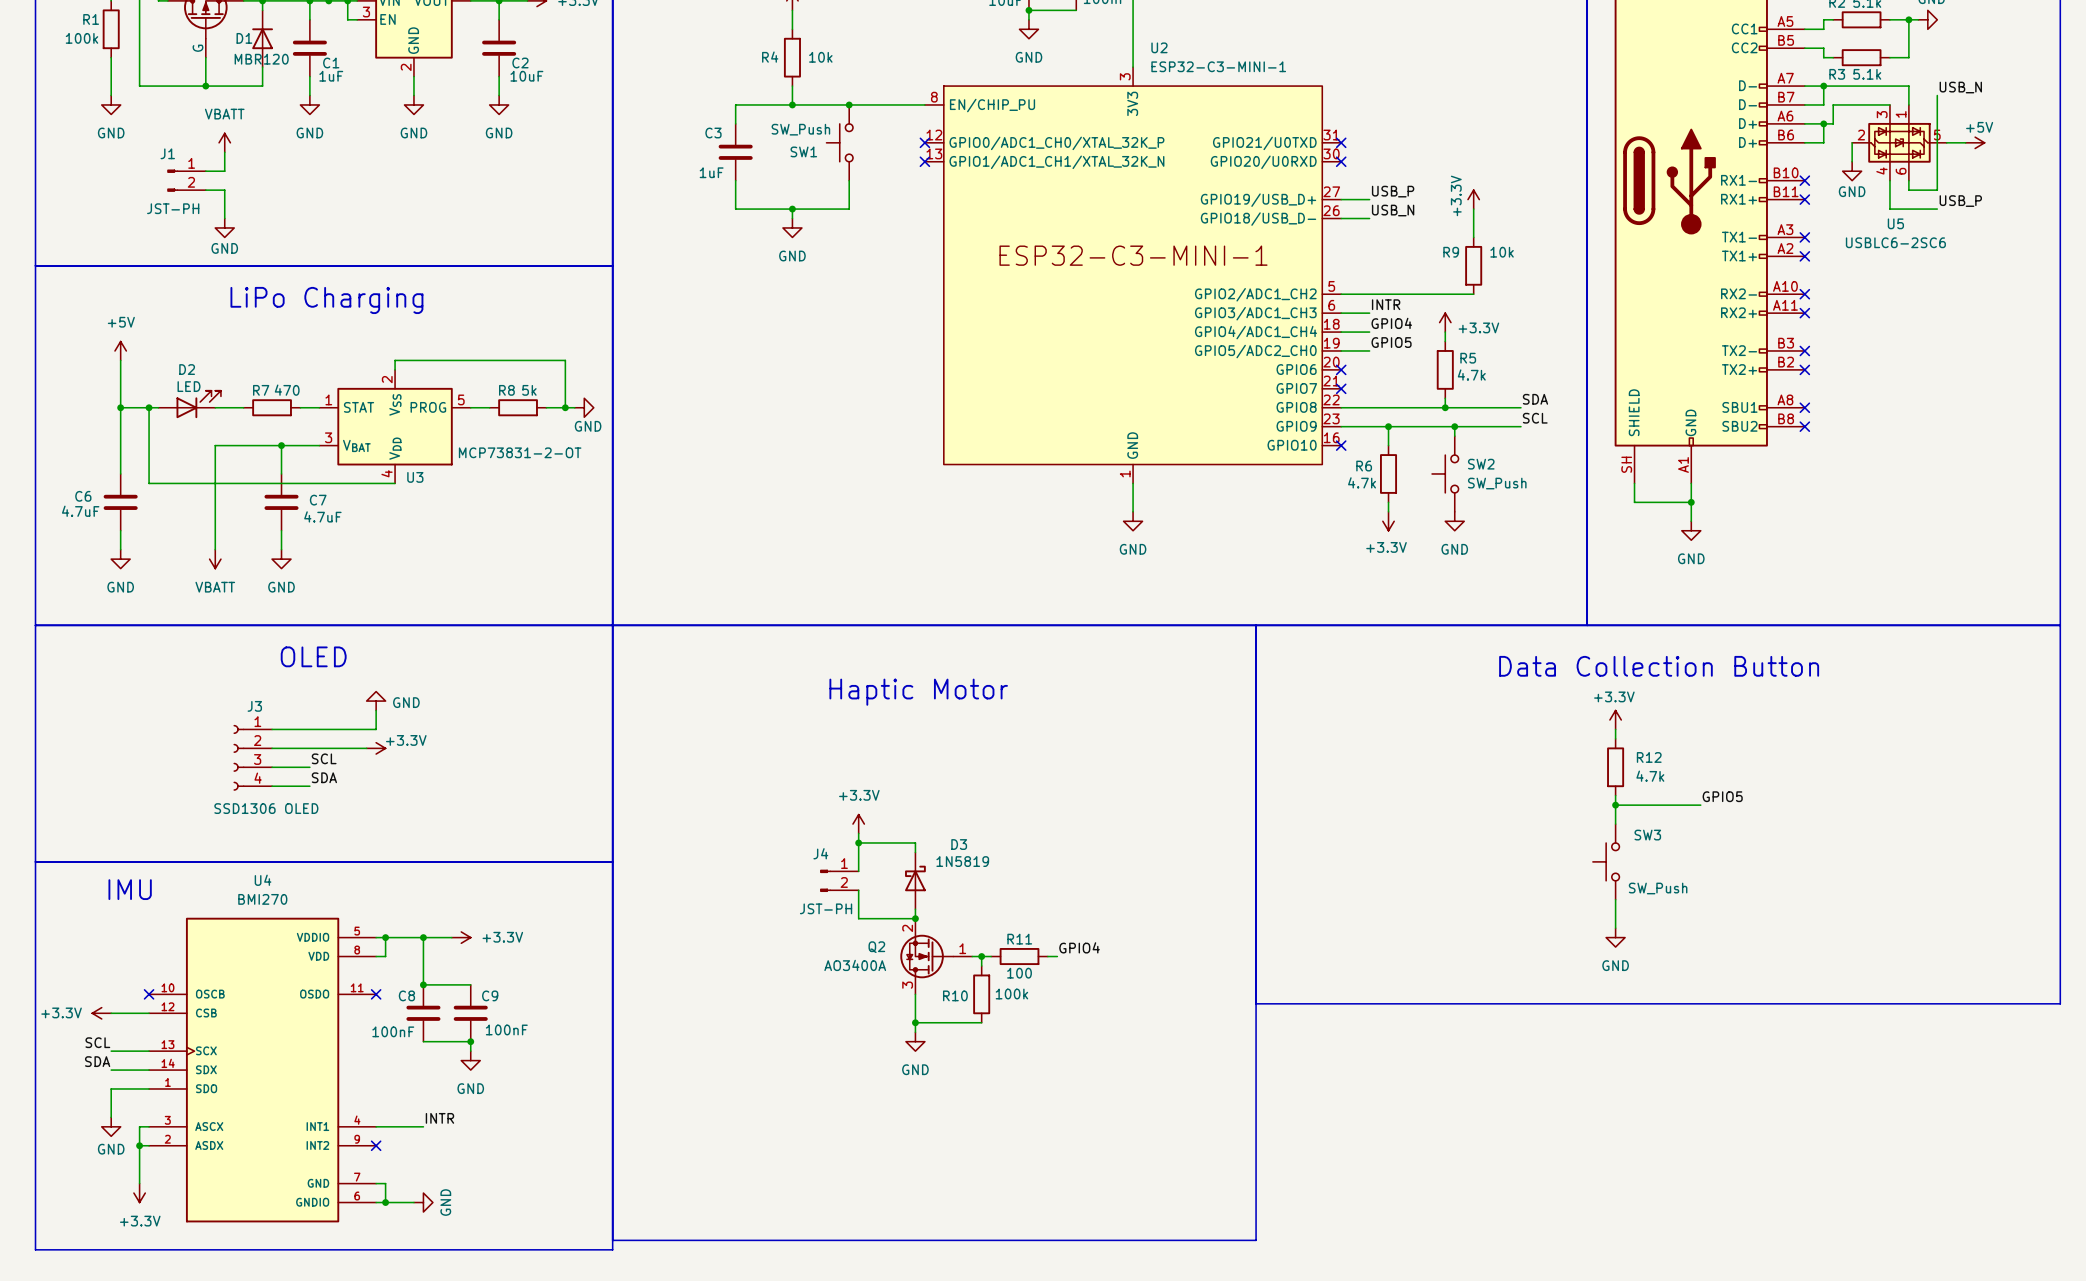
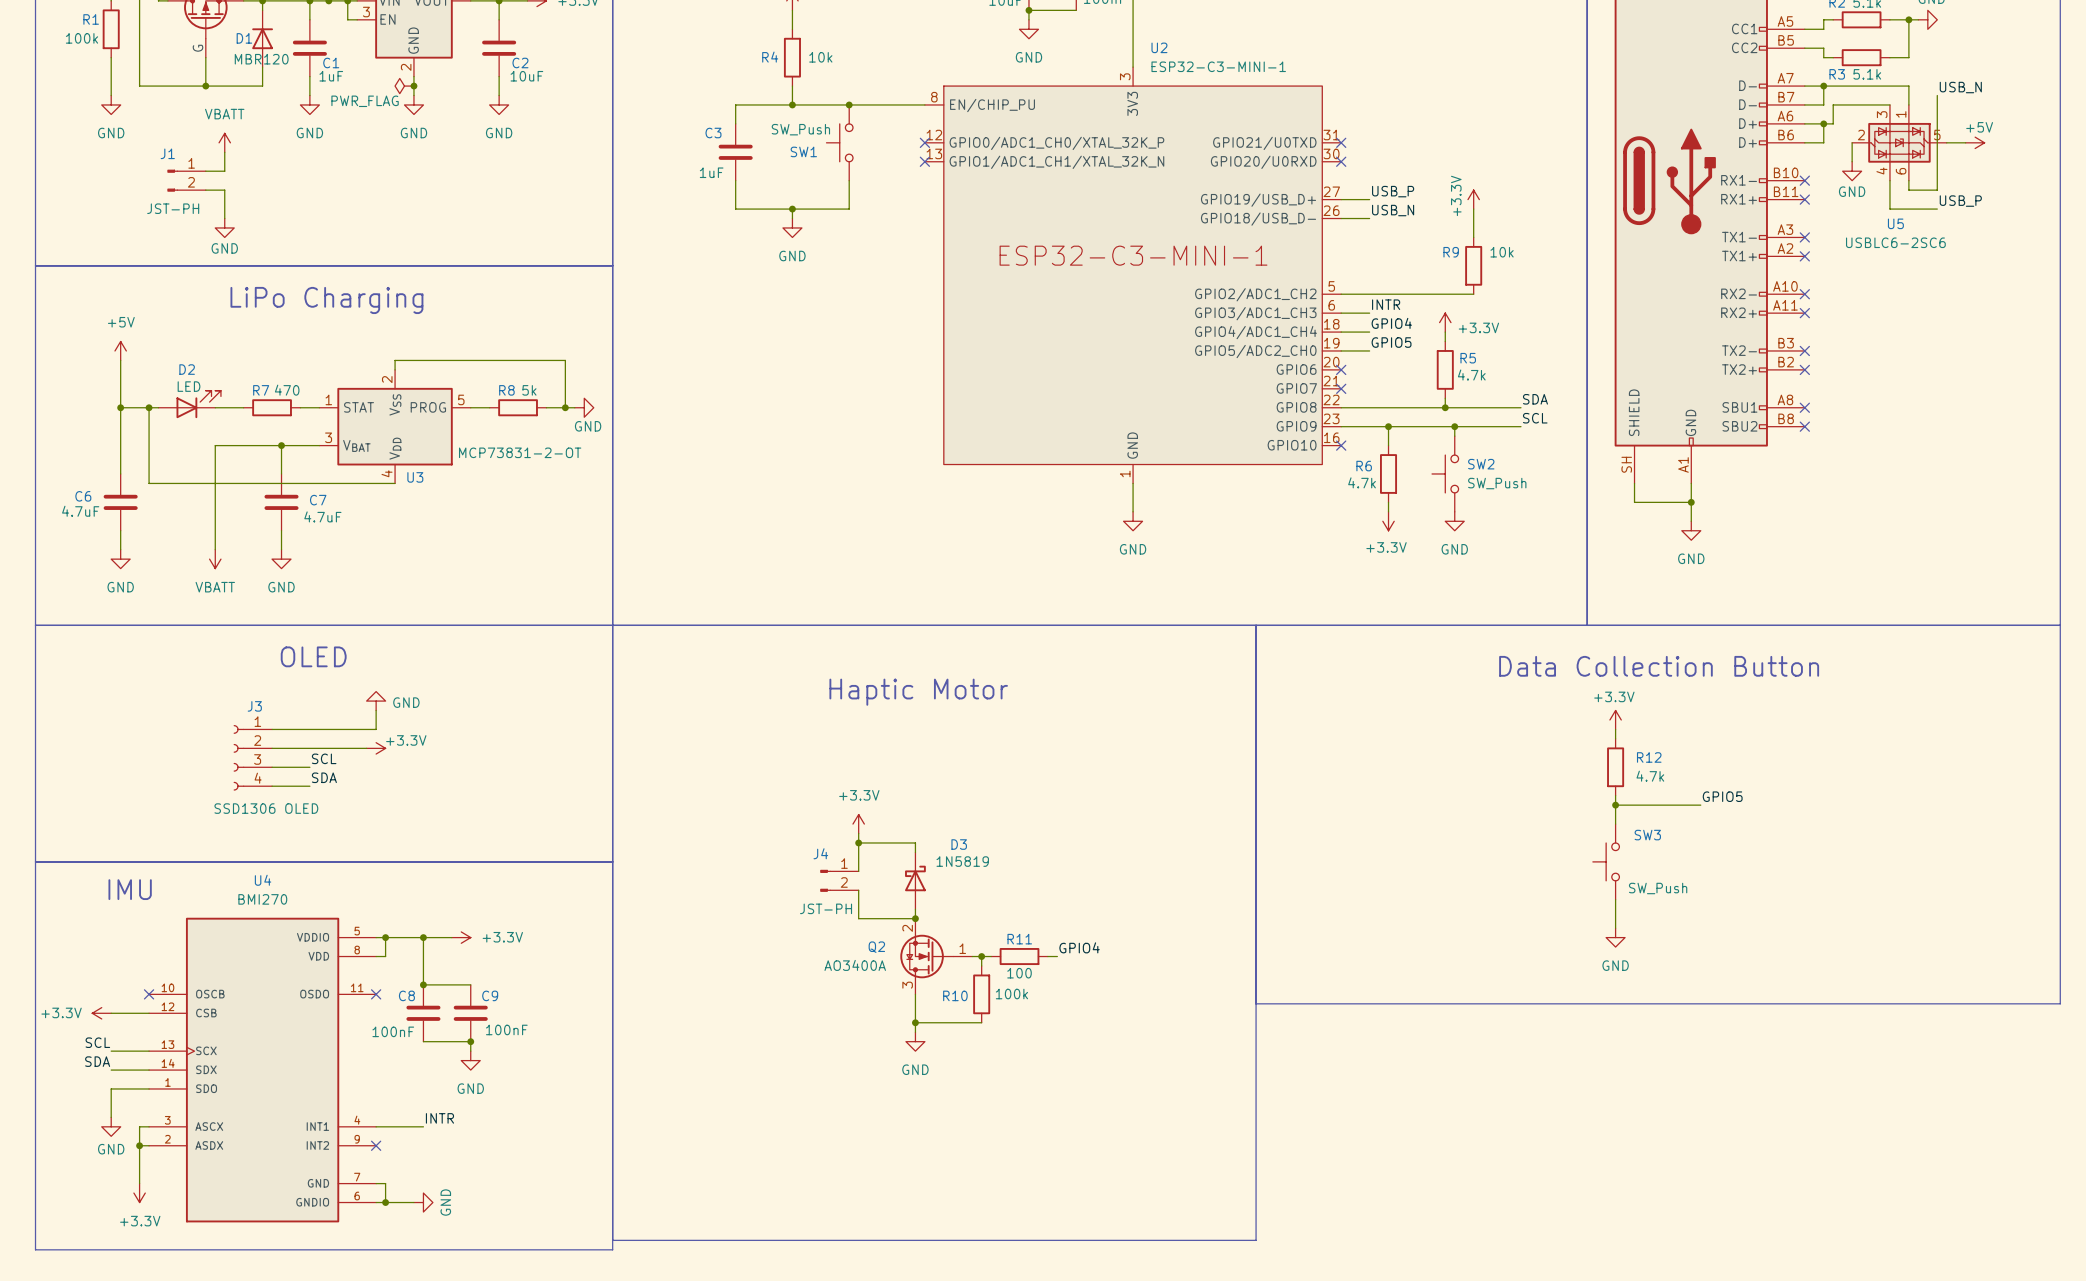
power symbol: none -> PWR_FLAG (404, 86)
junction: none -> (413, 86)

